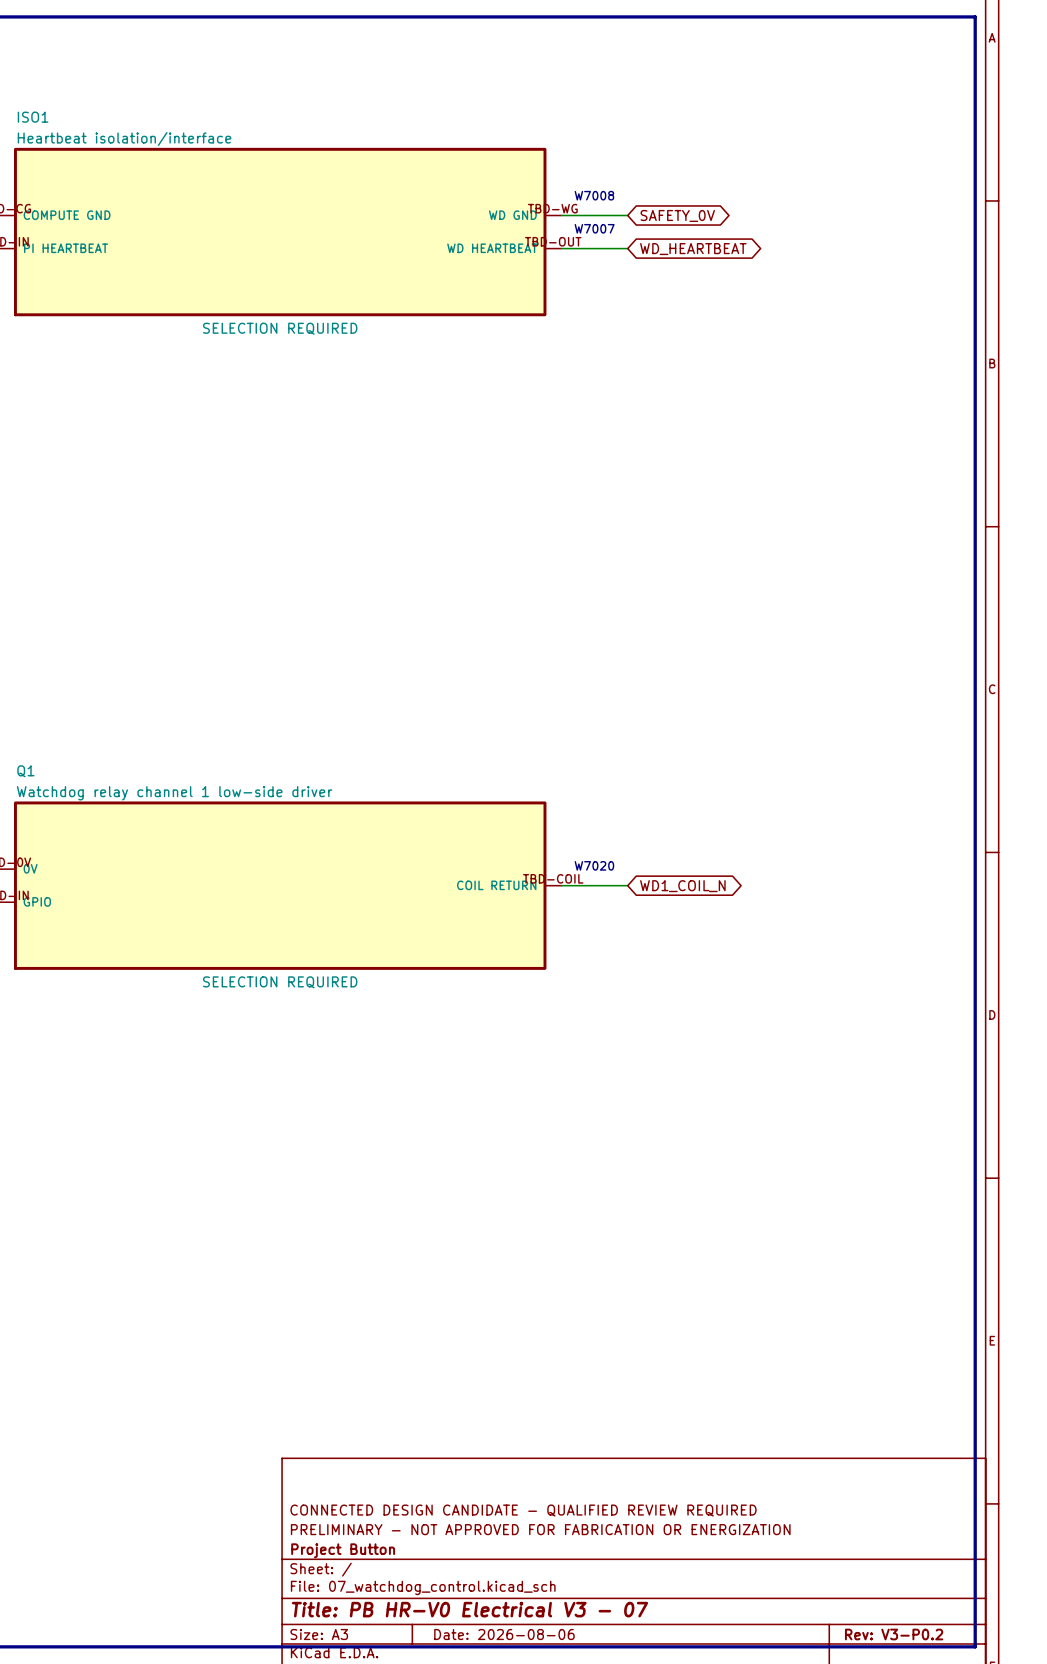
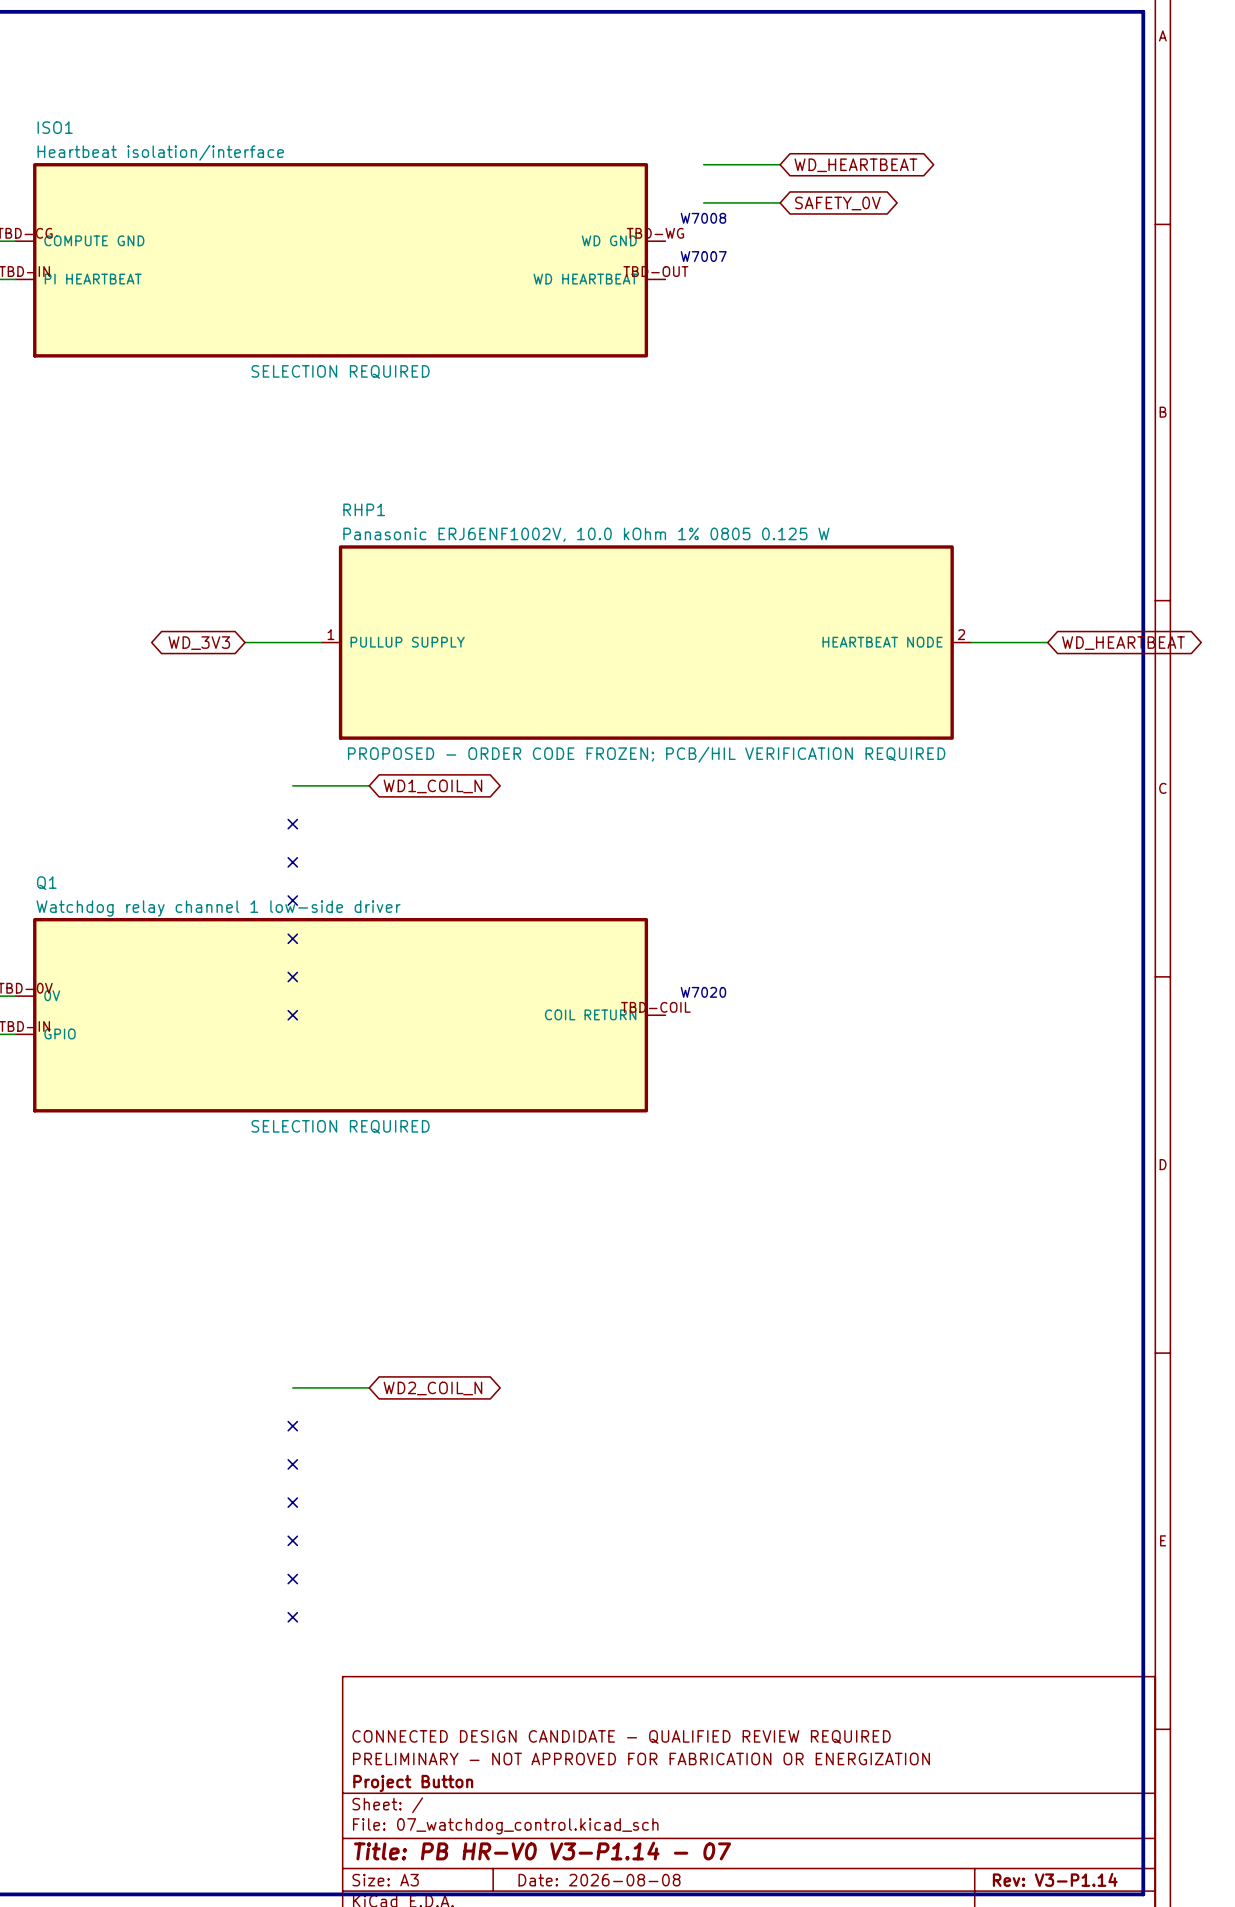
wire: (561, 215) (627, 215) -> (703, 164) (780, 164)
global label position: SAFETY_0V (677, 215) -> SAFETY_0V (837, 203)
wire: (561, 248) (627, 248) -> (703, 202) (780, 202)
global label position: WD_HEARTBEAT (693, 249) -> WD_HEARTBEAT (855, 165)
global label: none -> WD_3V3 (199, 643)
wire: none -> (245, 642) (321, 642)
RHP1: none -> (646, 642)
wire: none -> (971, 642) (1047, 642)
global label: none -> WD_HEARTBEAT (1123, 643)
wire: none -> (292, 785) (369, 785)
global label: none -> WD1_COIL_N (432, 786)
no-connect mark: none -> (292, 824)
no-connect mark: none -> (292, 862)
no-connect mark: none -> (292, 900)
no-connect mark: none -> (292, 938)
no-connect mark: none -> (292, 977)
no-connect mark: none -> (292, 1015)
wire: (561, 885) (627, 885) -> none
global label: WD1_COIL_N (682, 886) -> none
wire: none -> (292, 1387) (369, 1387)
global label: none -> WD2_COIL_N (432, 1388)
no-connect mark: none -> (292, 1426)
no-connect mark: none -> (292, 1464)
no-connect mark: none -> (292, 1502)
no-connect mark: none -> (292, 1540)
no-connect mark: none -> (292, 1579)
no-connect mark: none -> (292, 1617)
title block: Title: PB HR-V0 Electrical V3 - 07 (469, 1609) -> Title: PB HR-V0 V3-P1.14 - 07 (542, 1851)
title block: Date: 2026-08-06 (504, 1634) -> Date: 2026-08-08 (599, 1880)
title block: Rev: V3-P0.2 (894, 1634) -> Rev: V3-P1.14 (1055, 1879)

